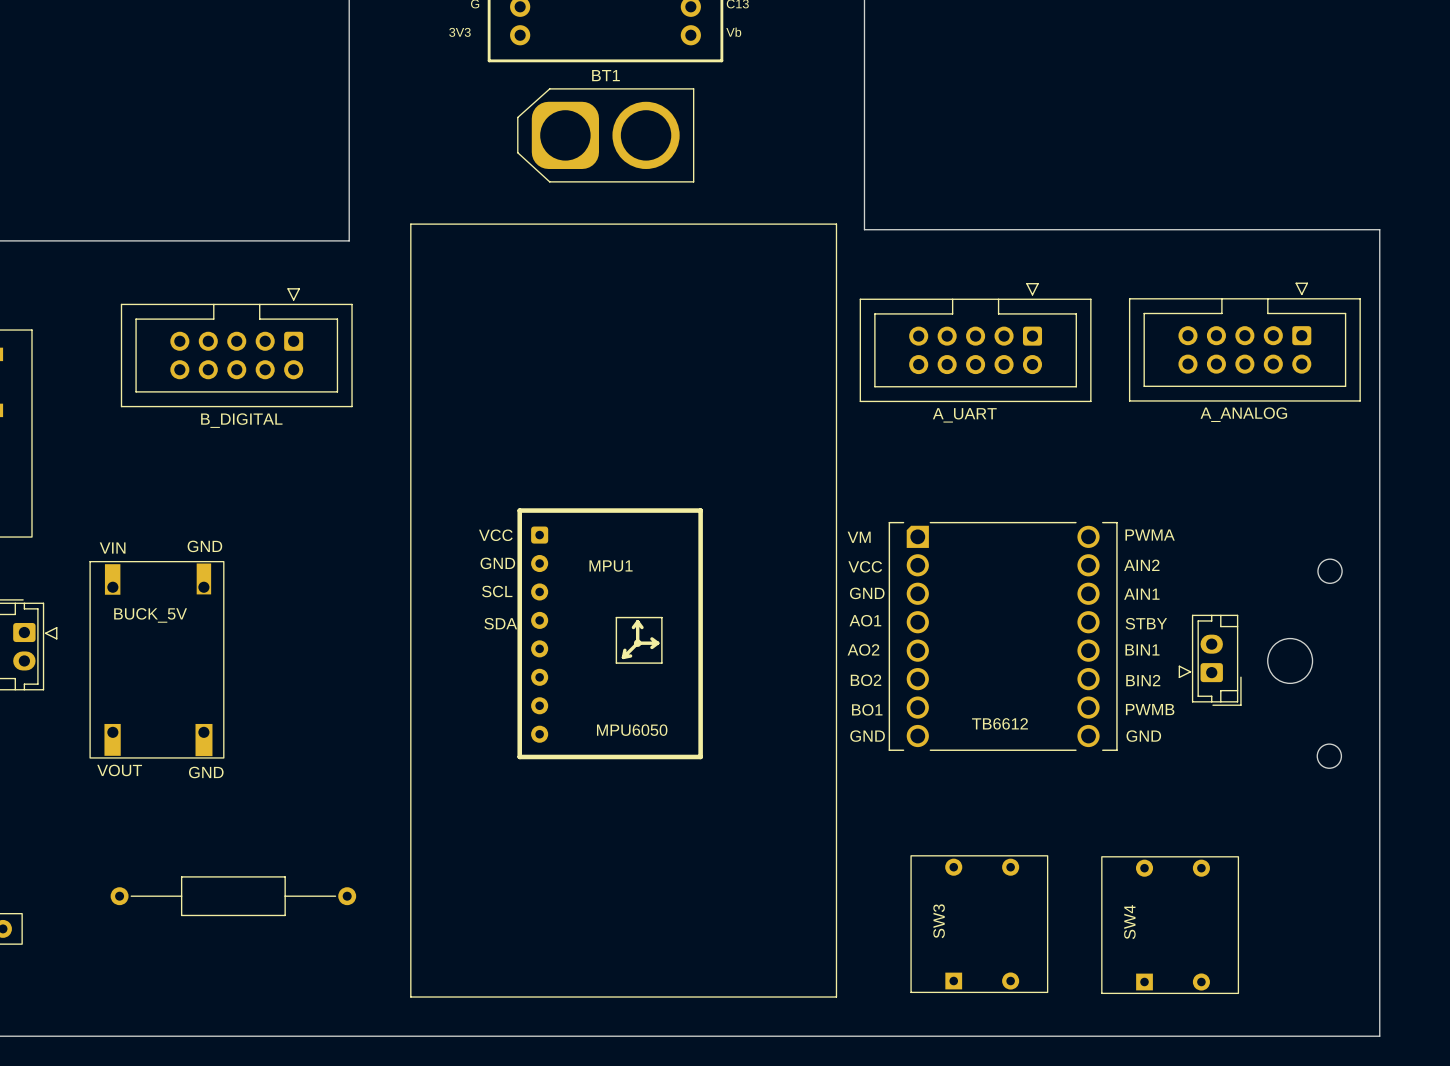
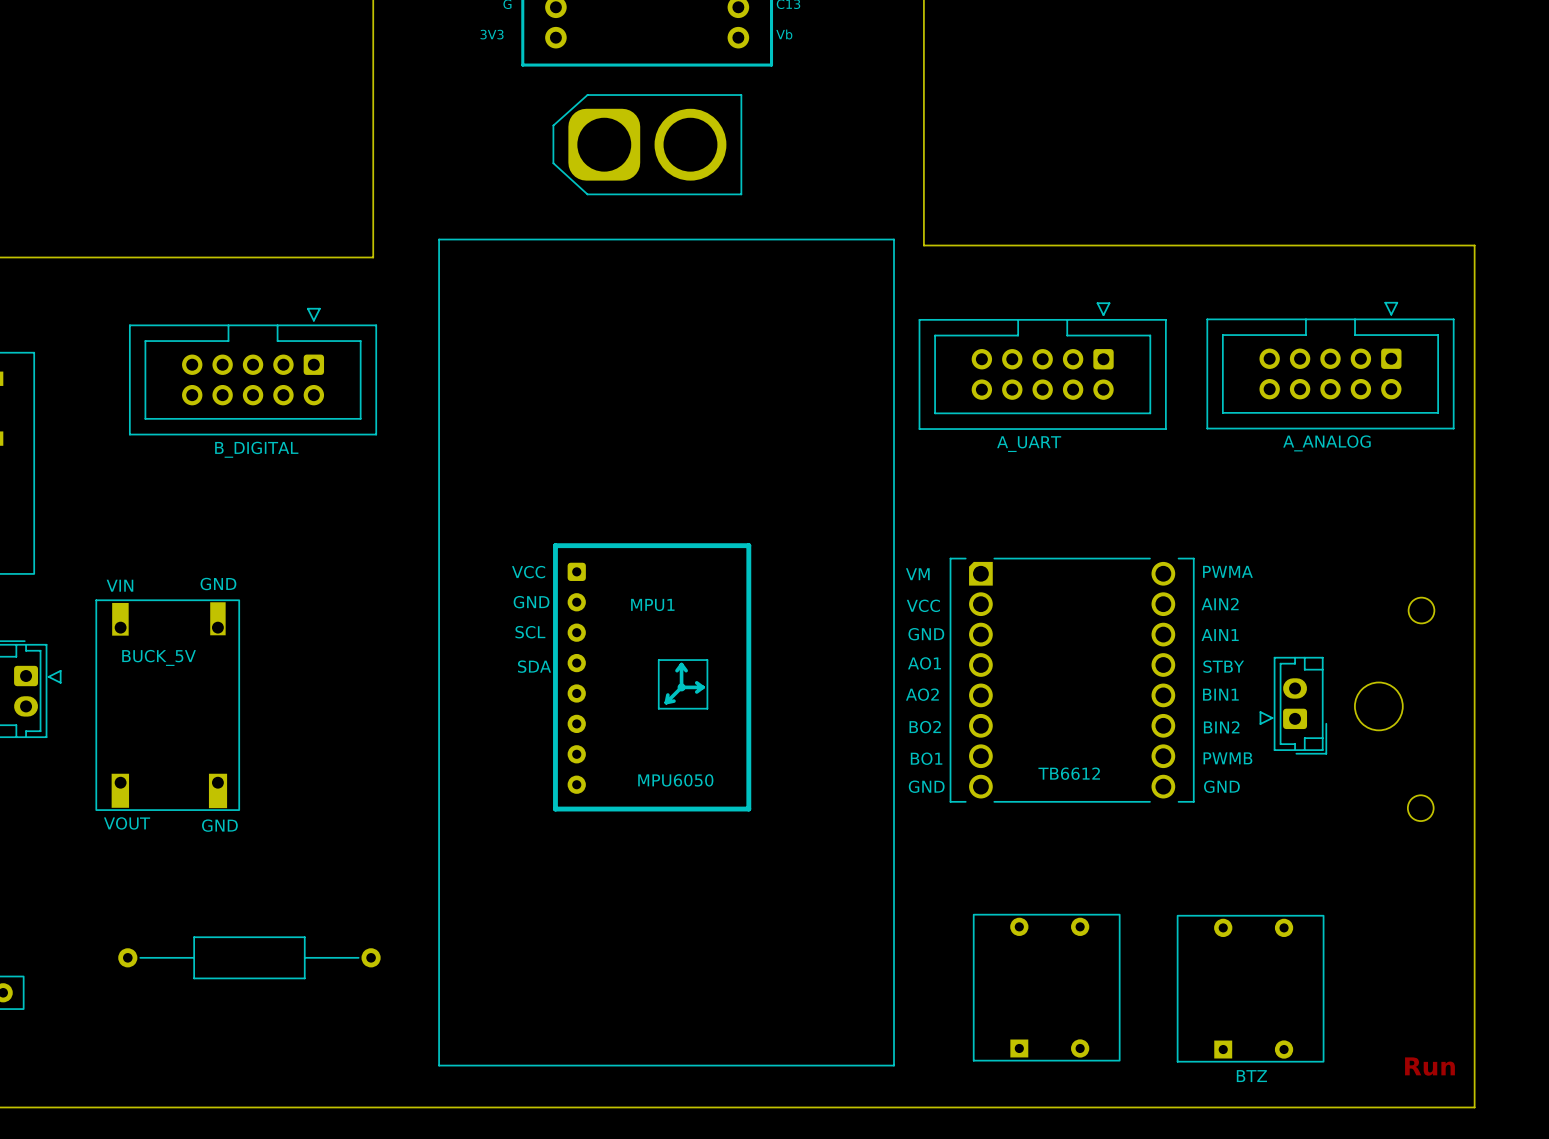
BT1 name: BT1 (606, 75) -> none
SW3 name: SW3 (939, 921) -> none
SW4 name: SW4 (1129, 922) -> none
text: none -> Run (1429, 1066)
text: none -> BTZ (1251, 1076)

